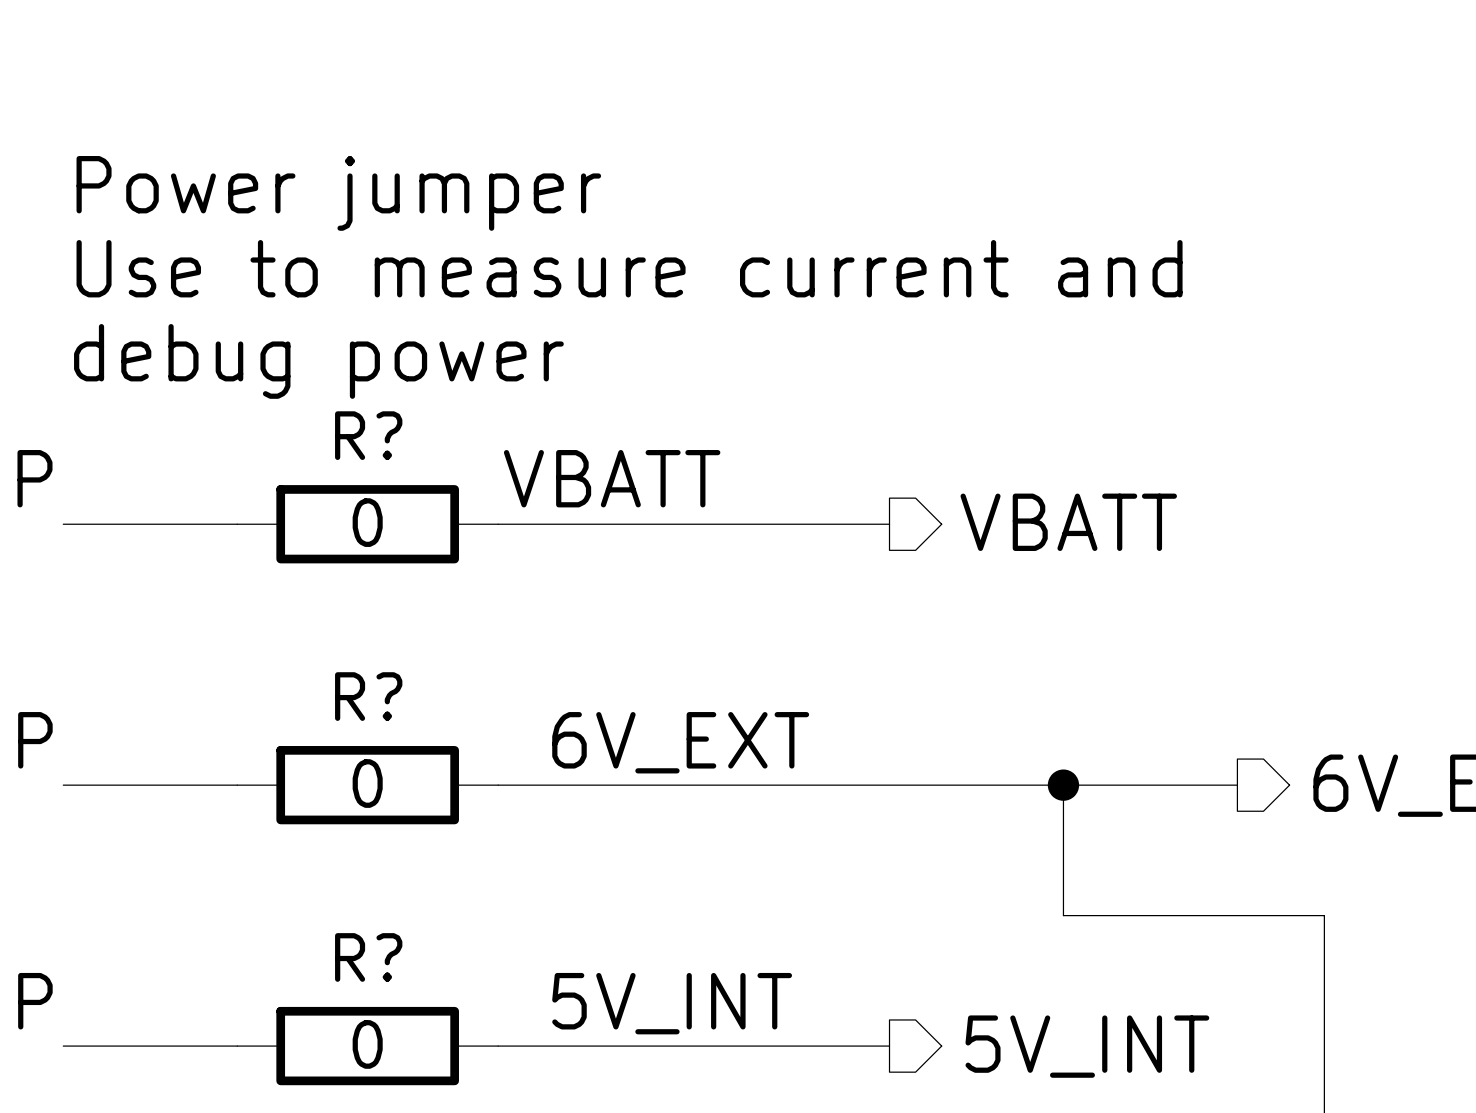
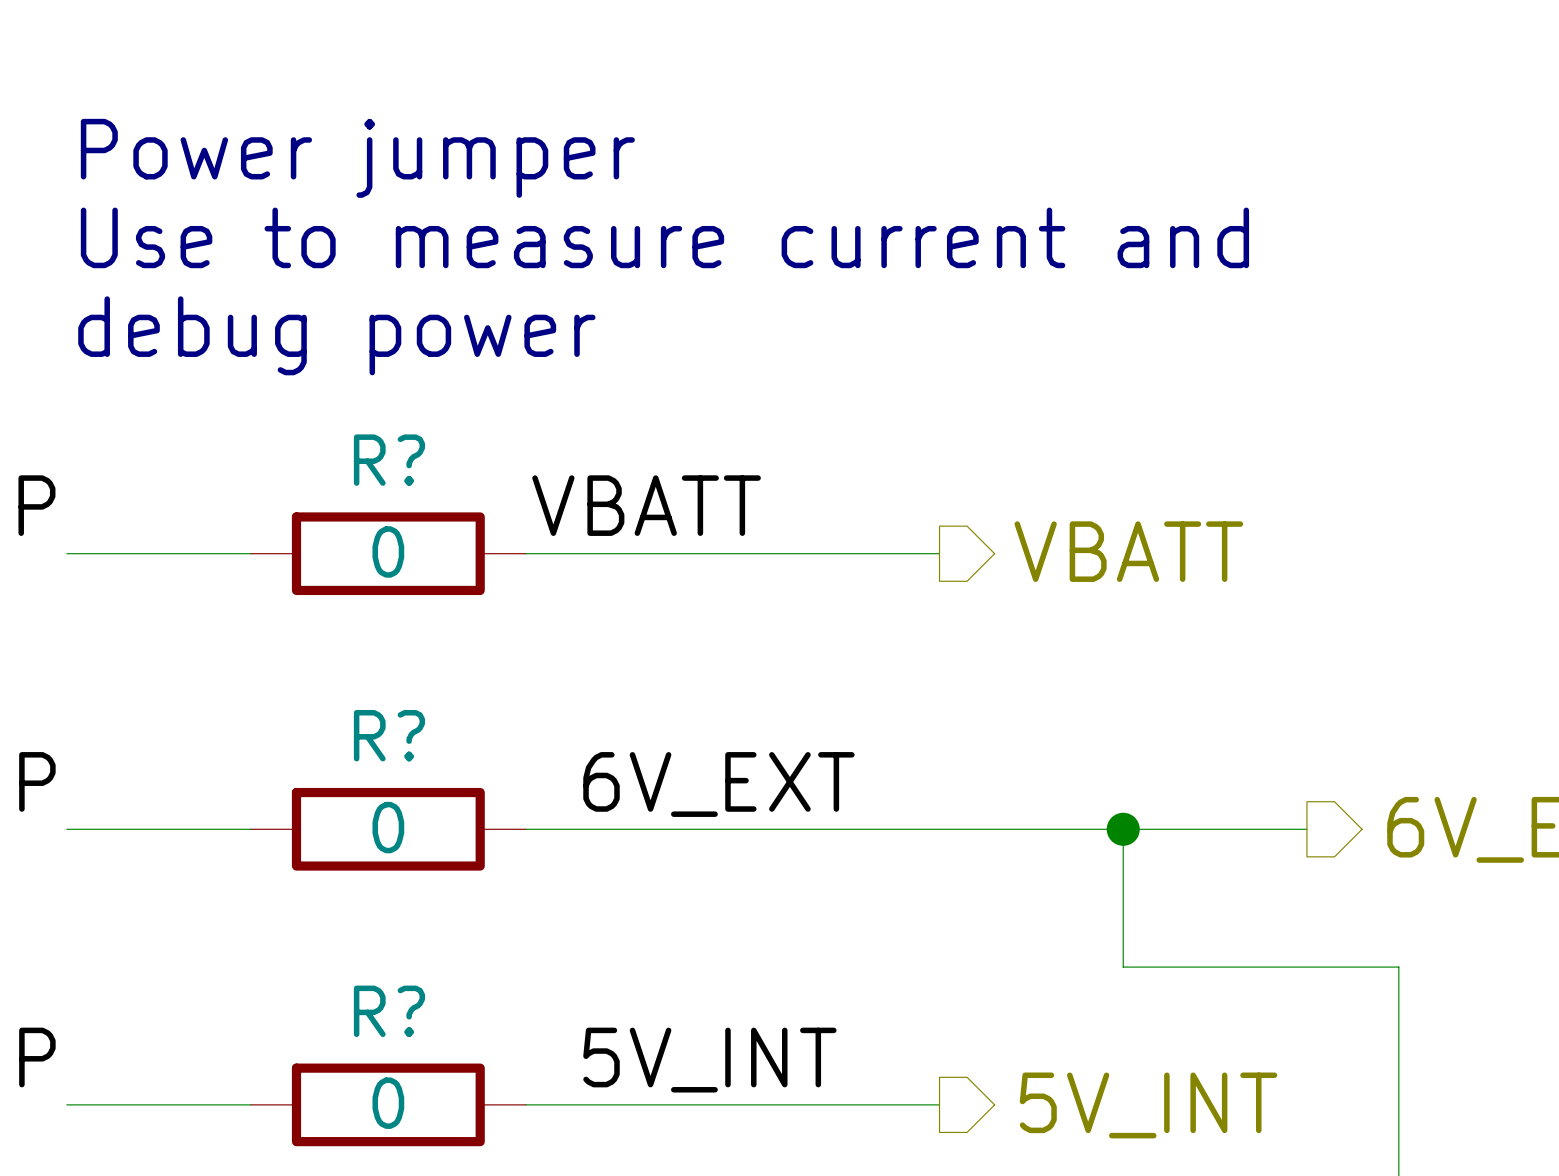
text position: Power jumper (338, 193) -> Power jumper (357, 158)
text position: Use to measure current and (629, 268) -> Use to measure current and (664, 237)
text position: debug power (318, 361) -> debug power (336, 335)

